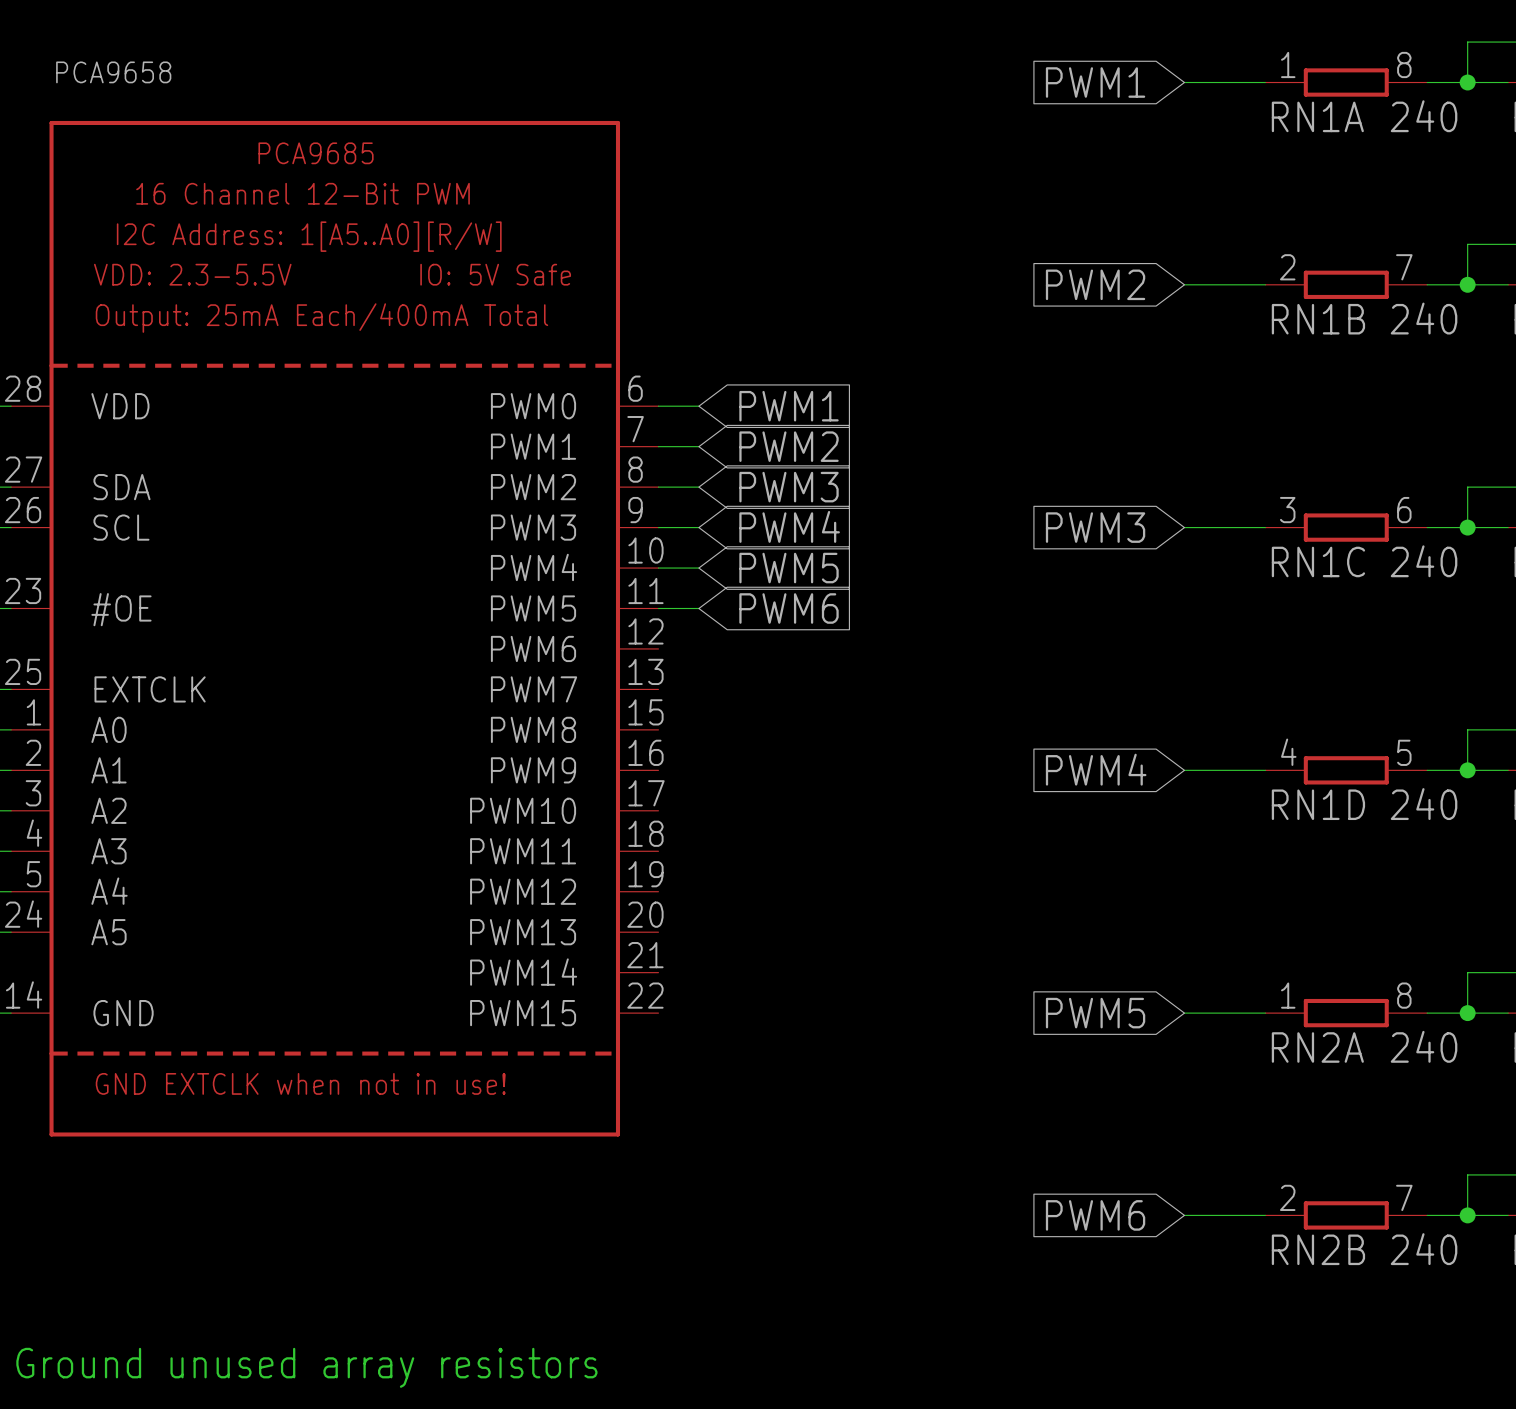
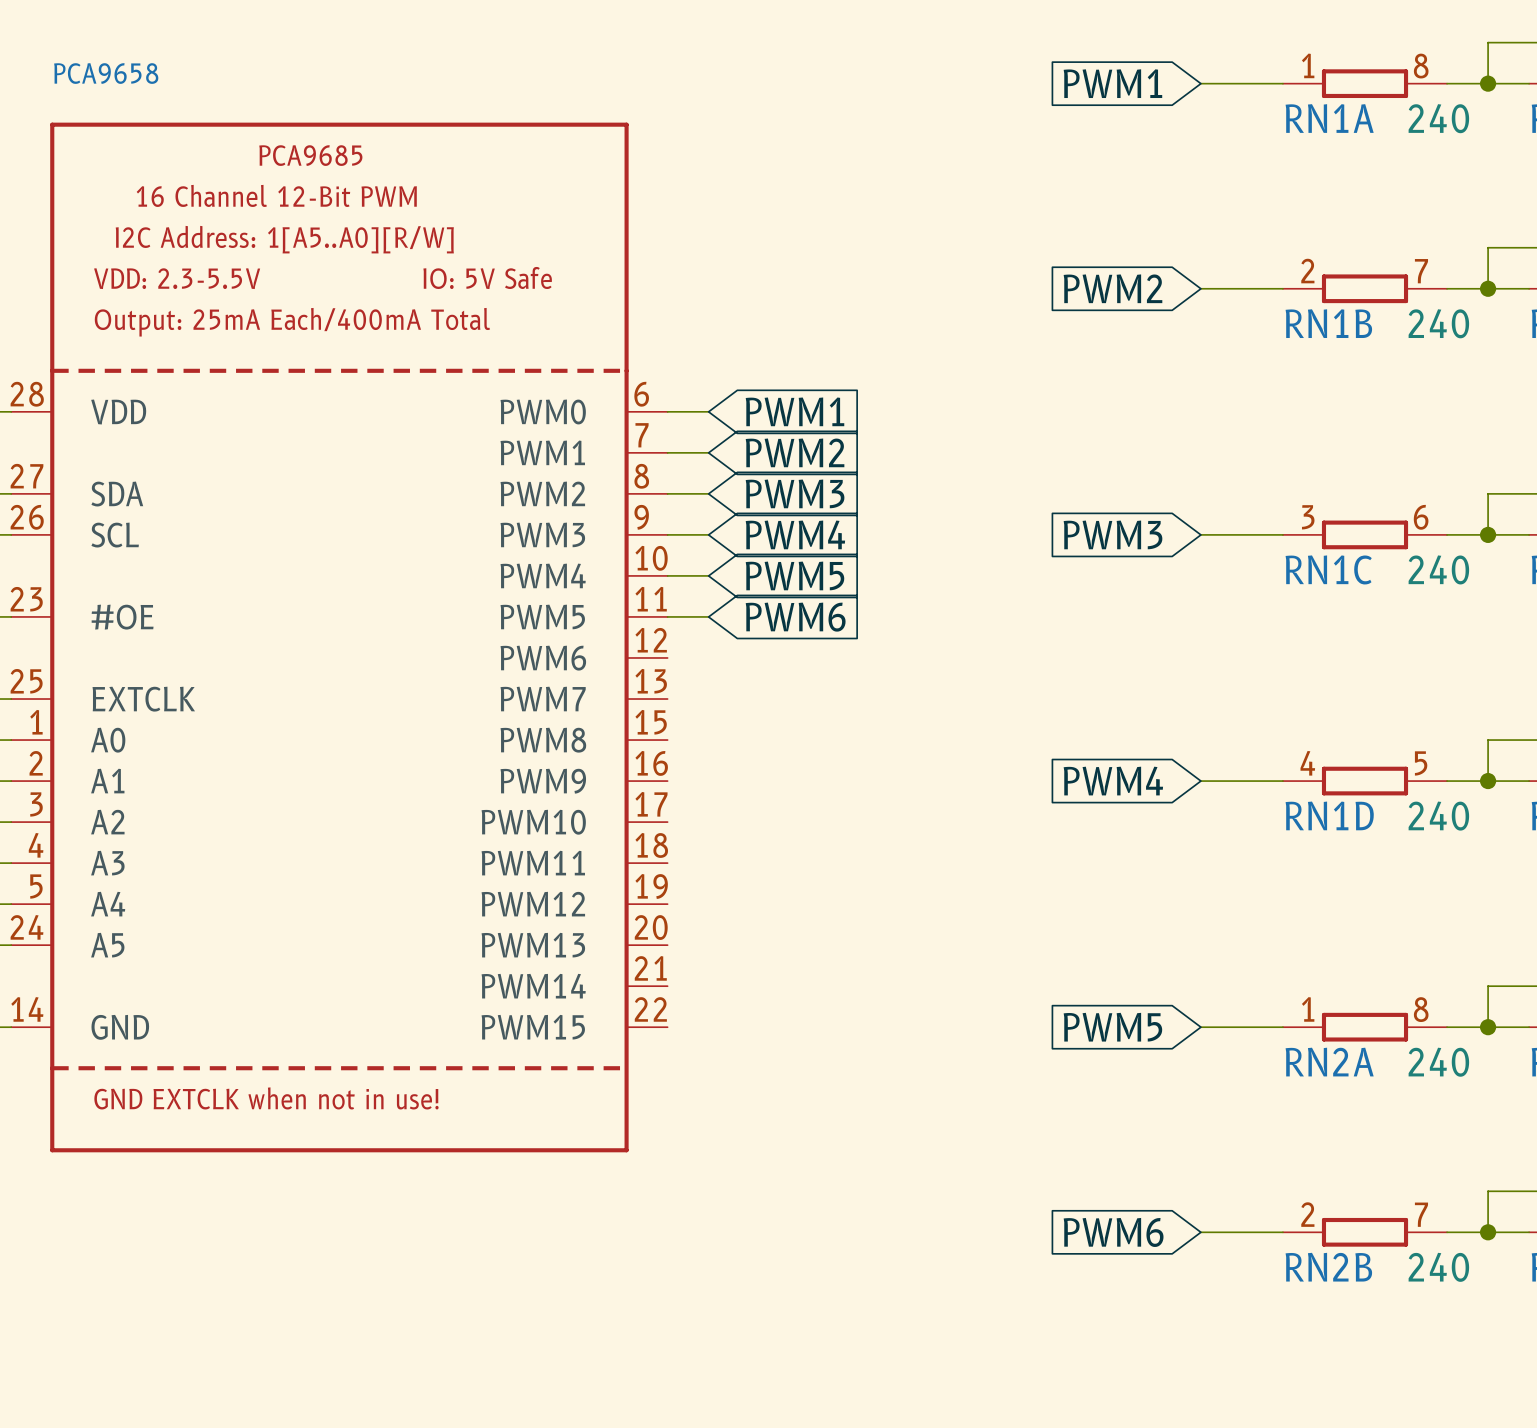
text: Ground unused array resistors (306, 1367) -> none

